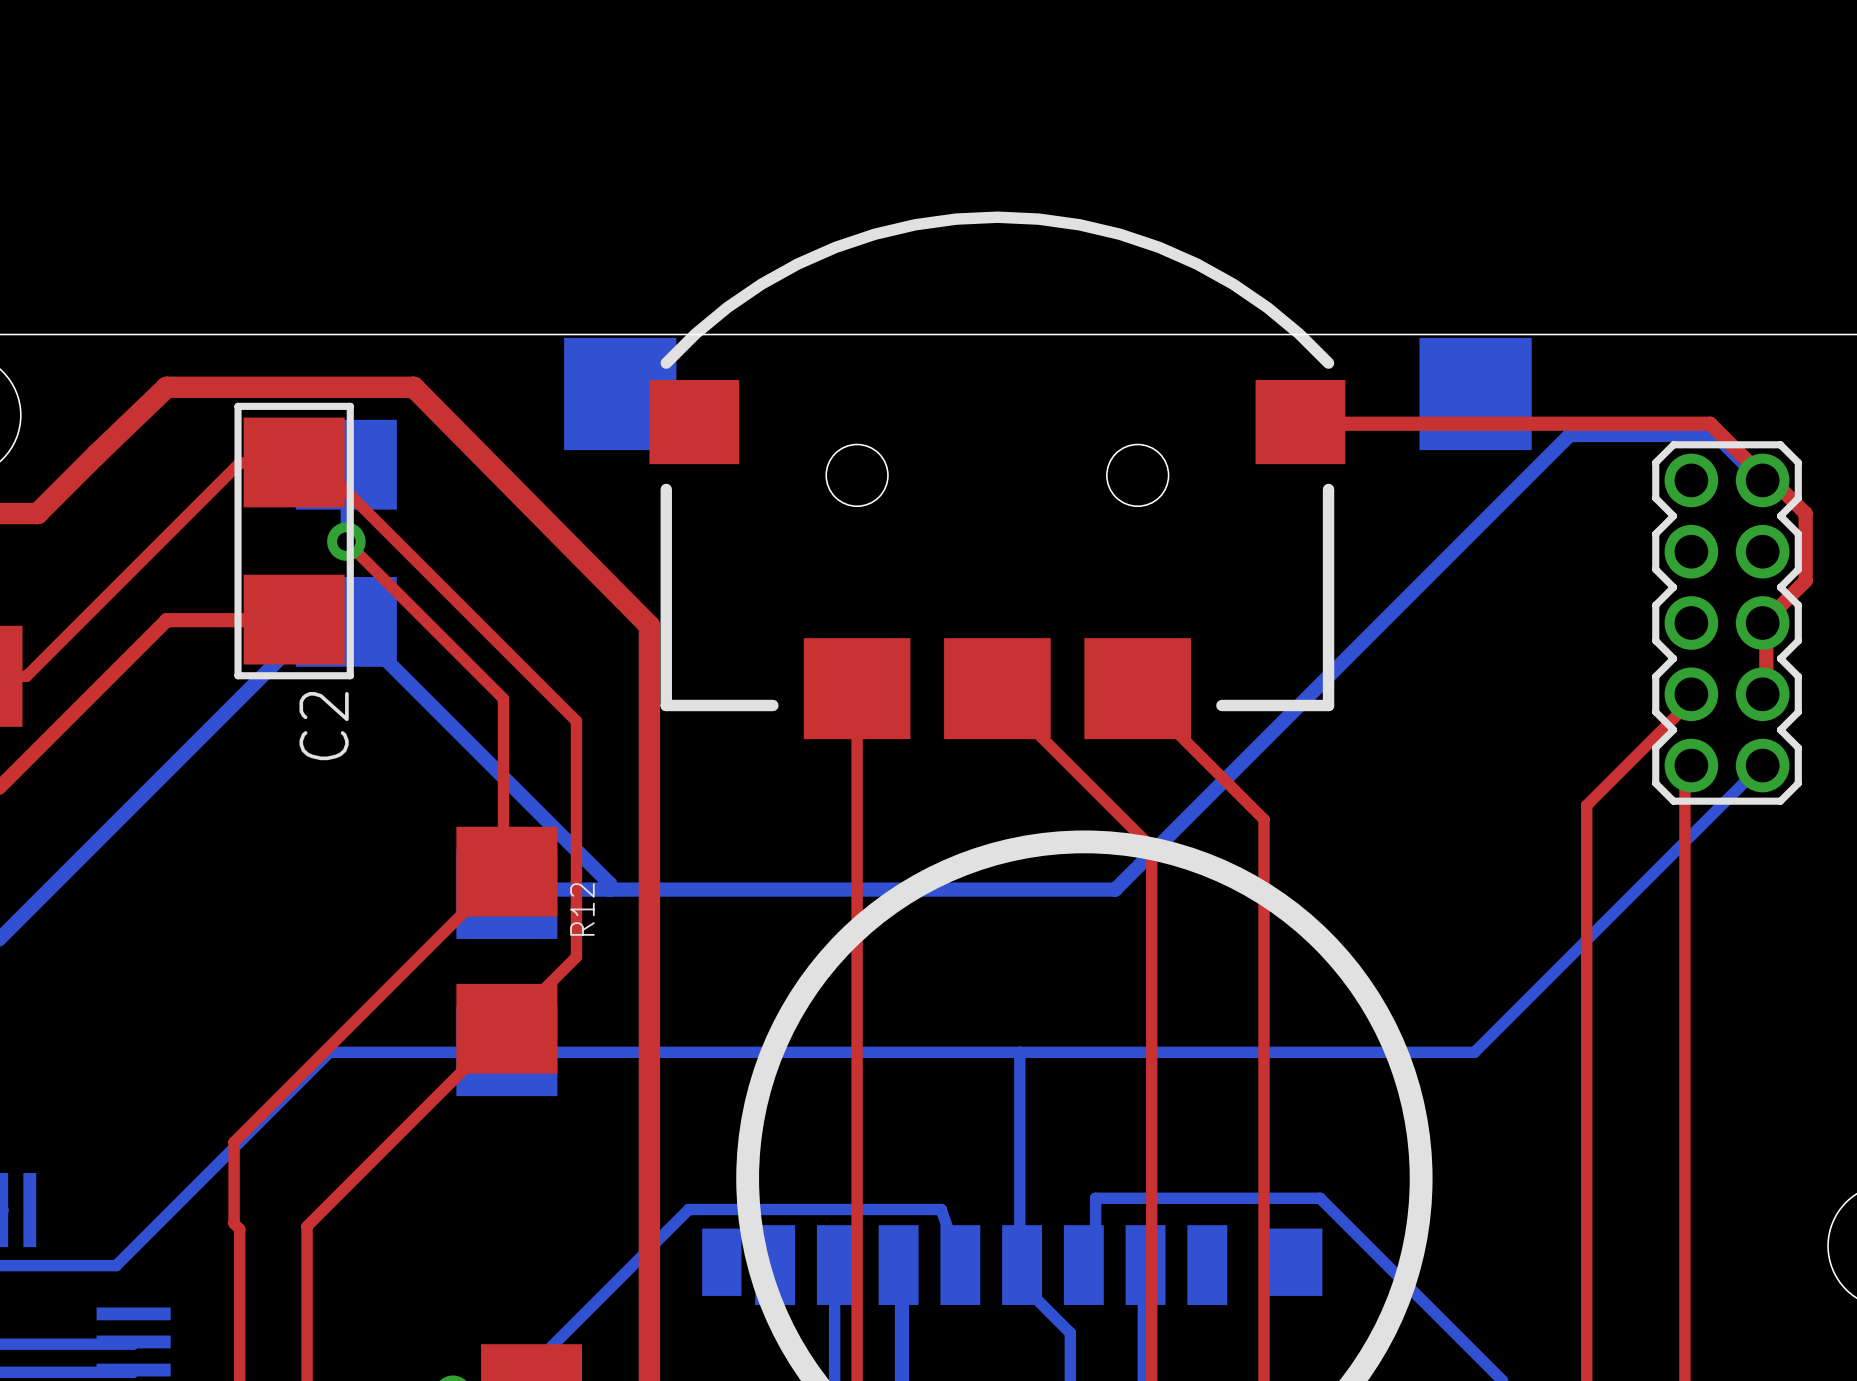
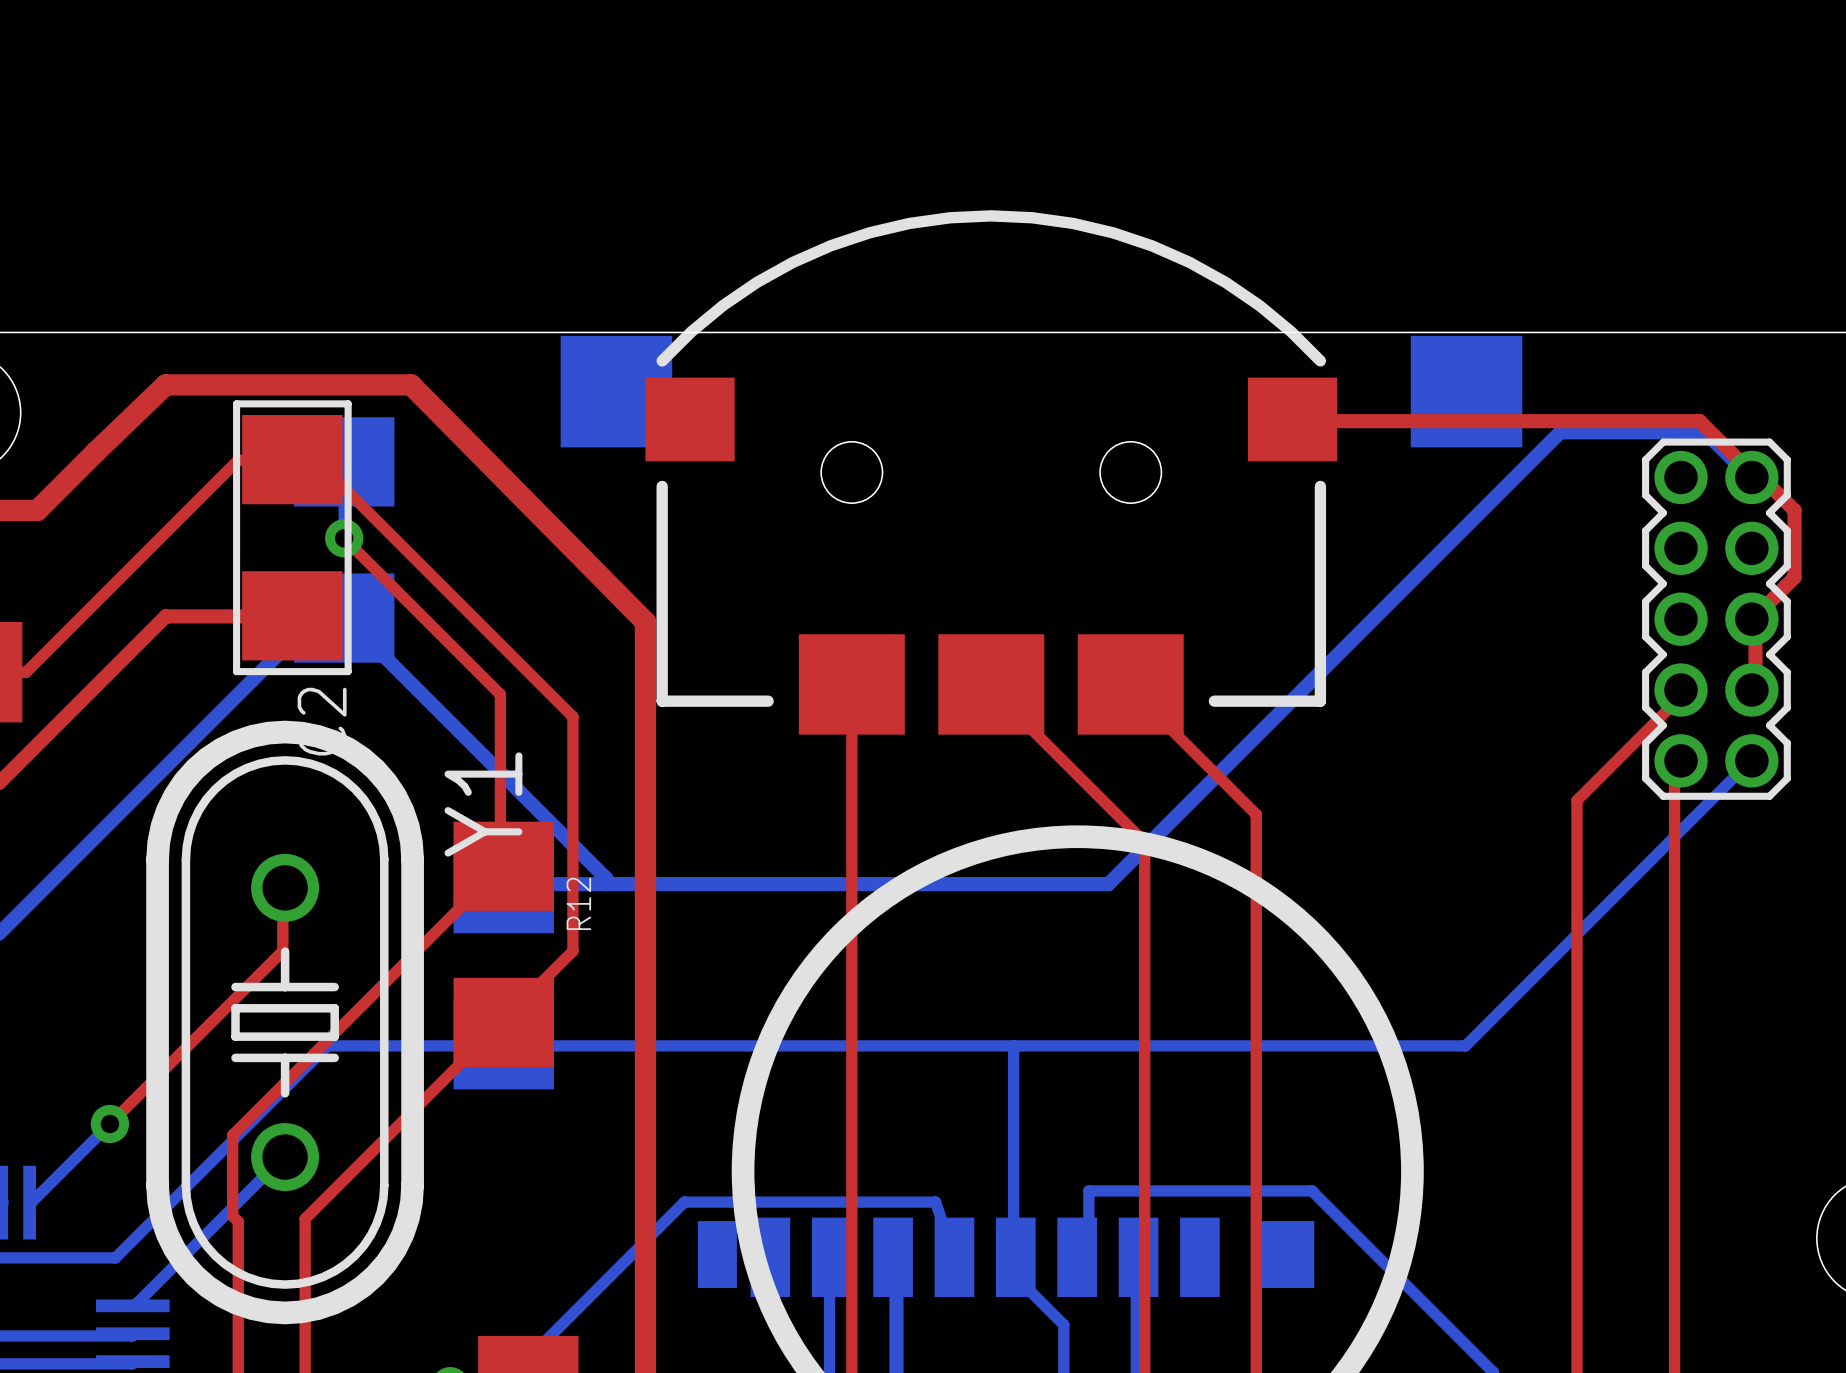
top track: none -> (285, 887) (282, 889) (282, 951) (109, 1124)
Y1: none -> (285, 1022)
bottom track: none -> (109, 1124) (29, 1202)
via: none -> (109, 1124)
bottom track: none -> (285, 1157) (132, 1305)

